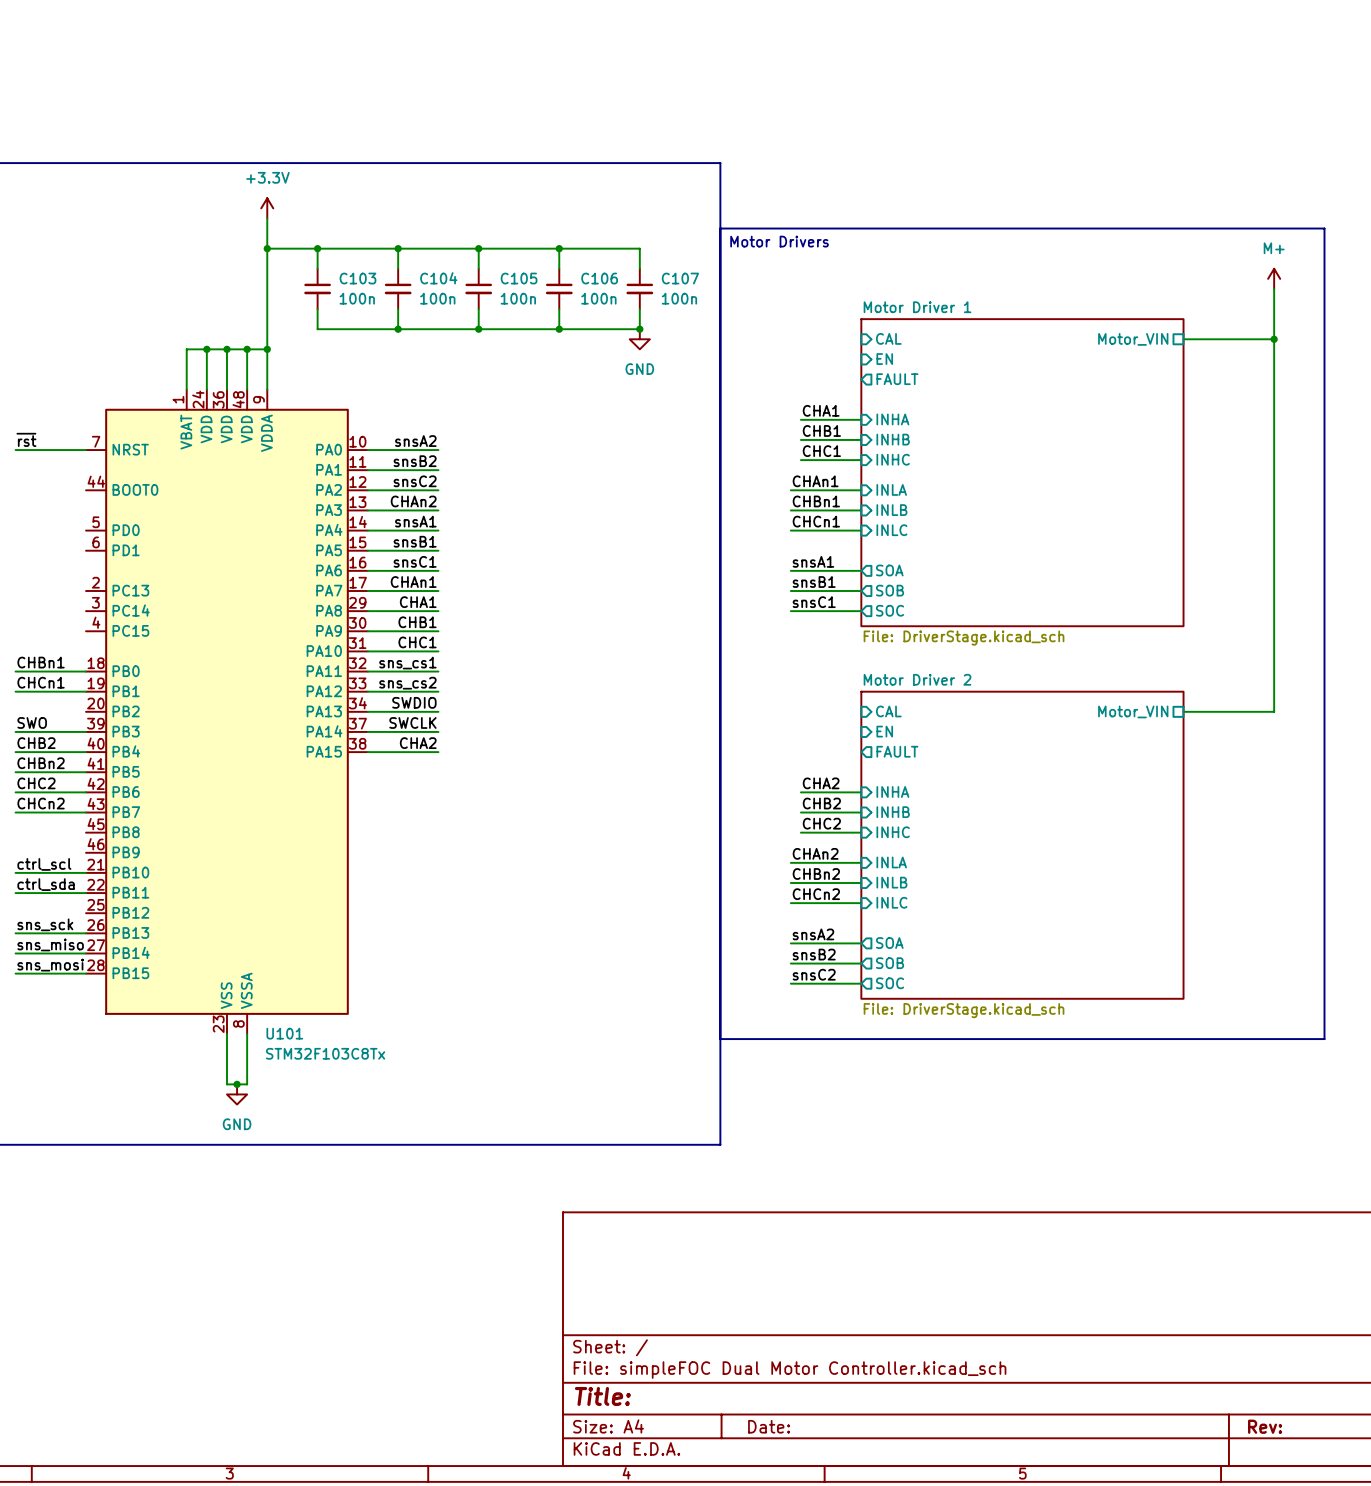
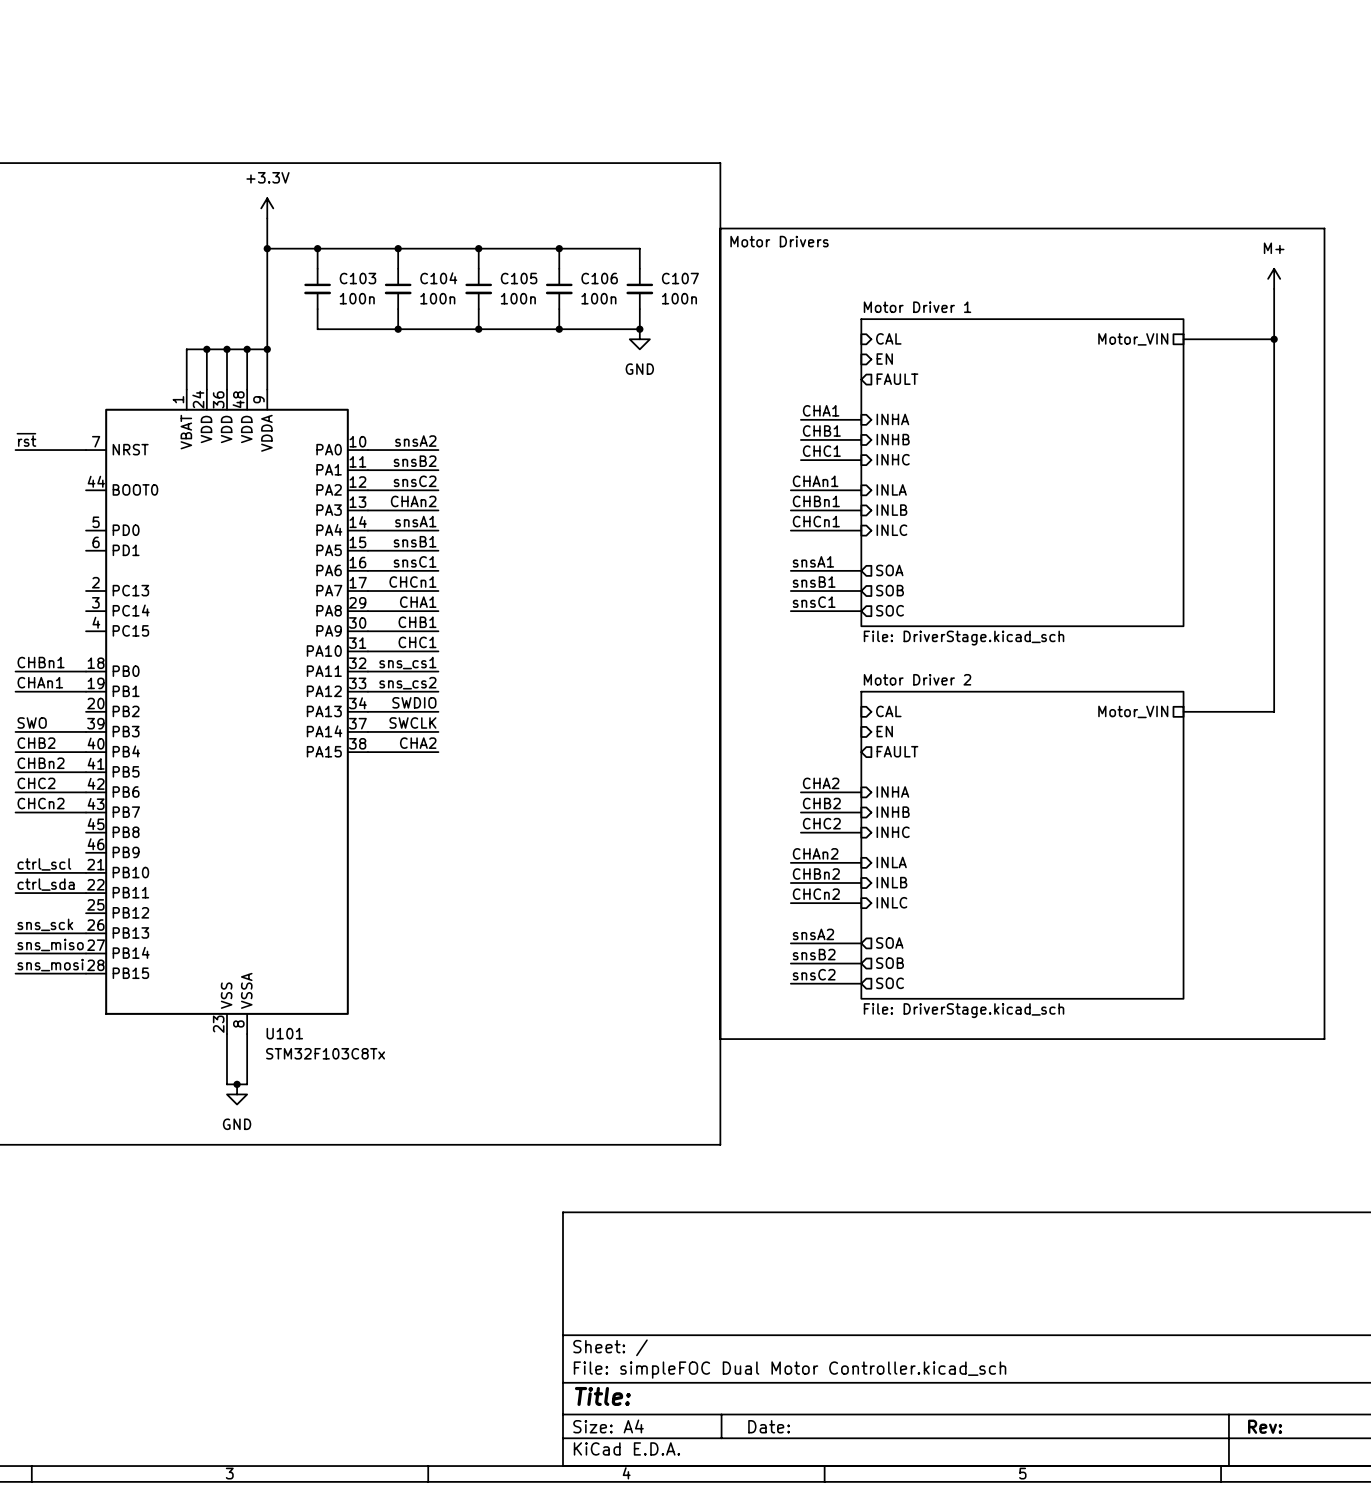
label: CHAn1 (413, 582) -> CHCn1 (412, 582)
label: CHCn1 (41, 682) -> CHAn1 (40, 682)

